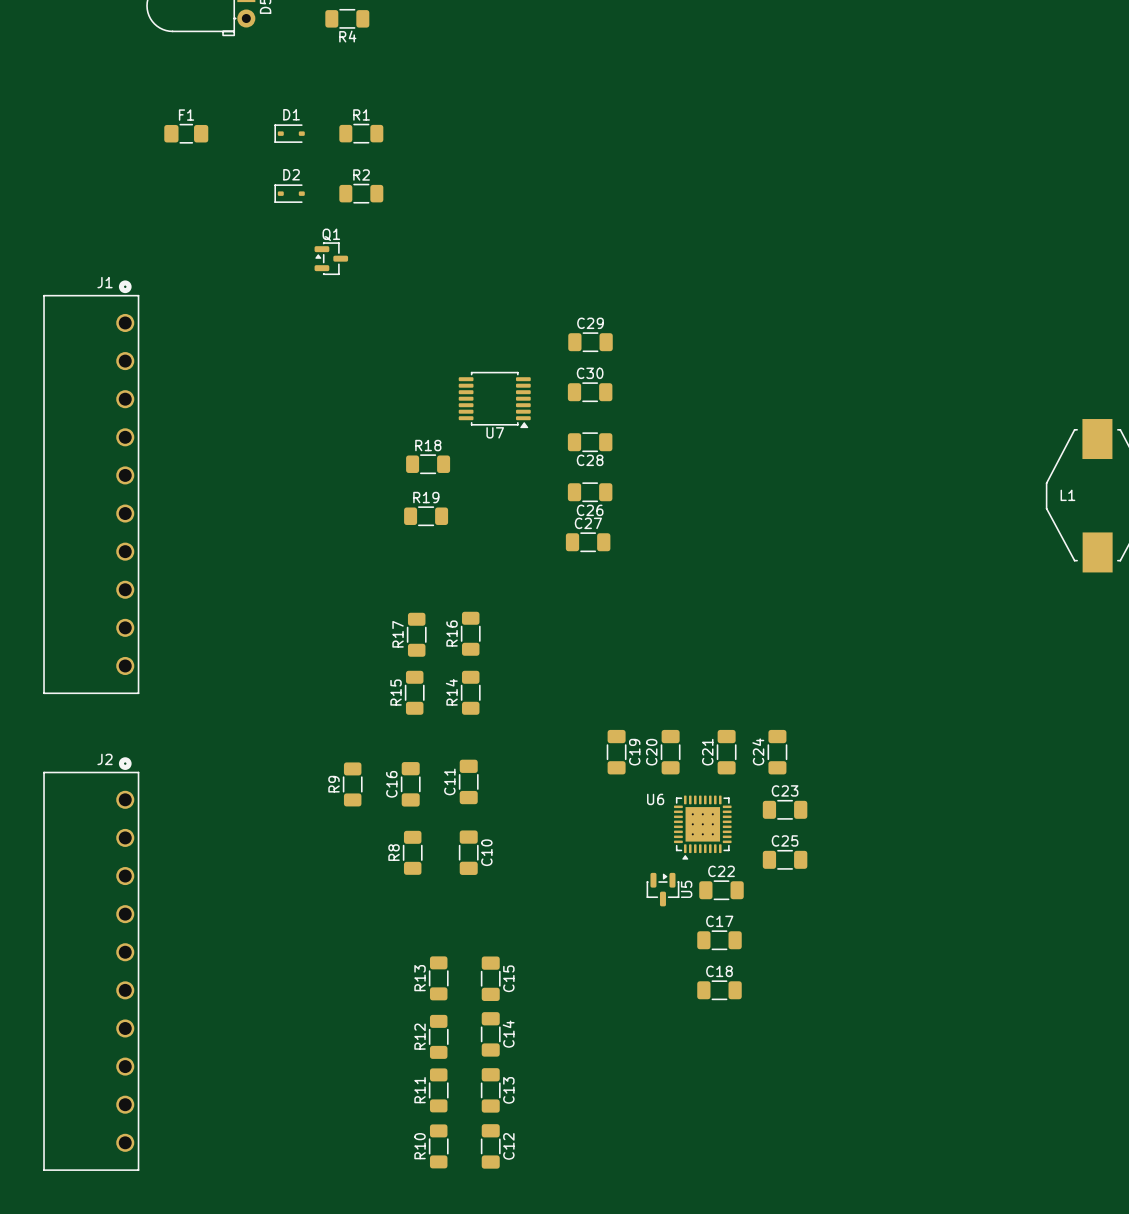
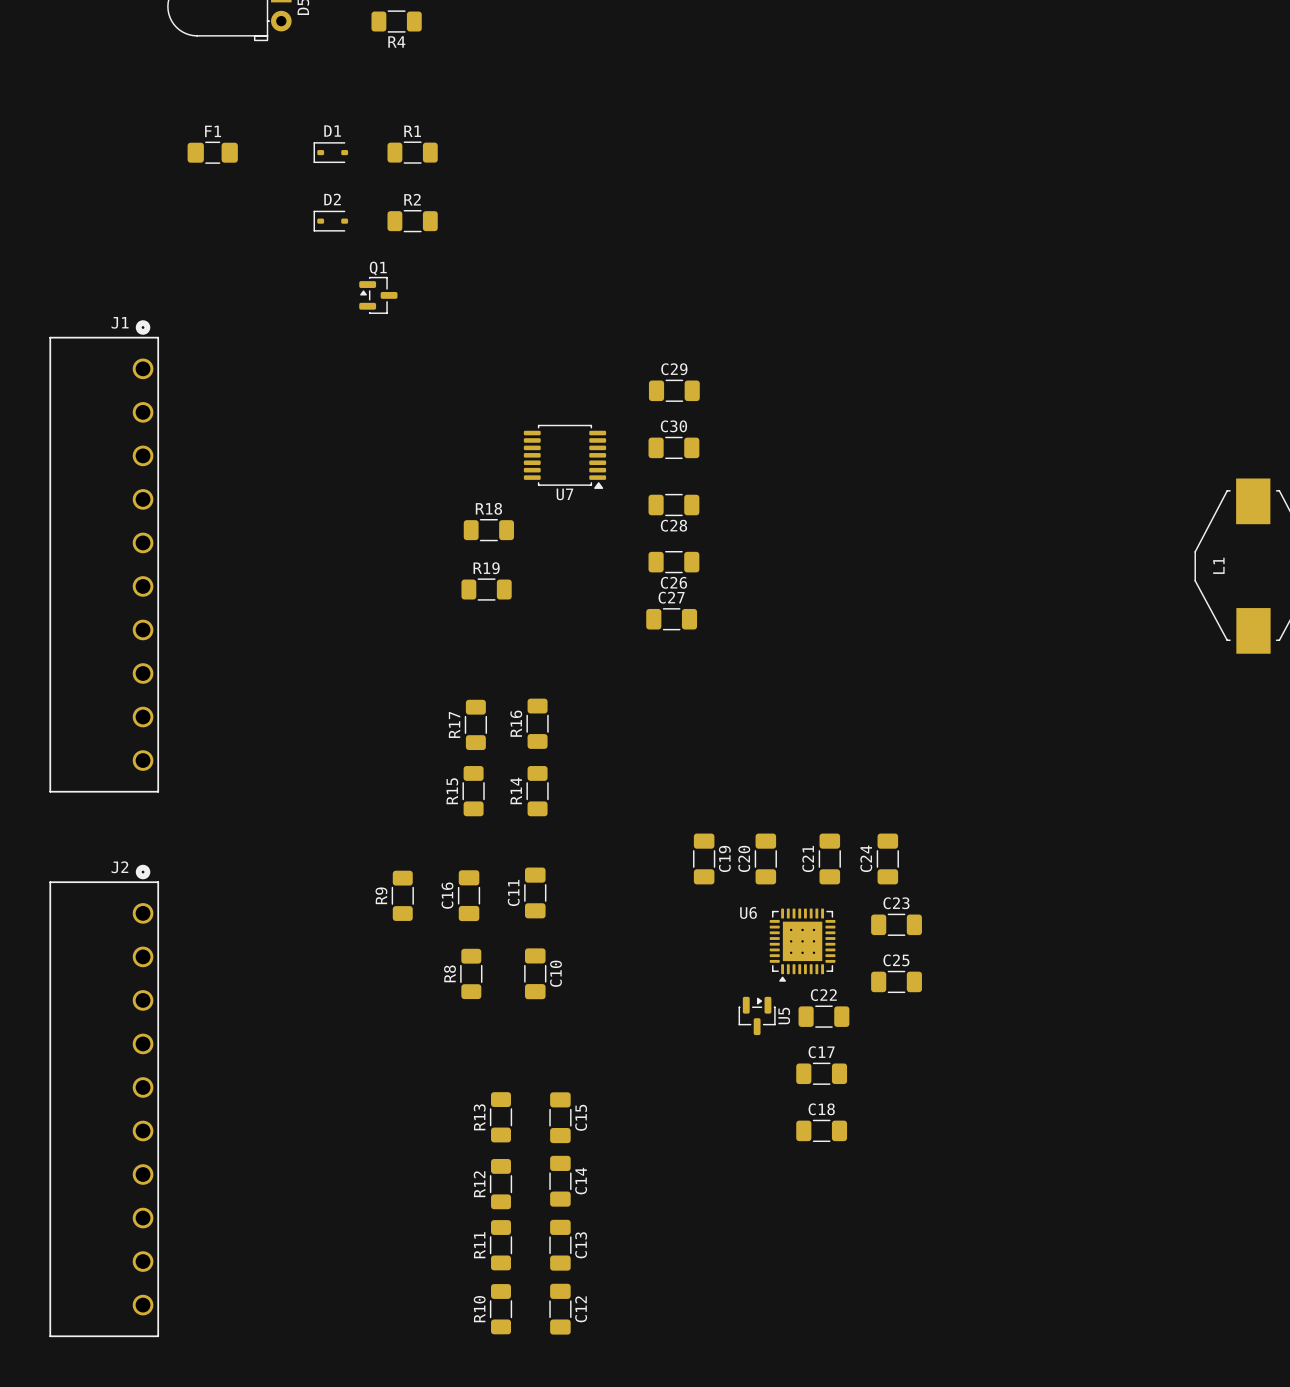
L1 name rotation: 0° (1067, 495) -> 90° counterclockwise (1218, 565)

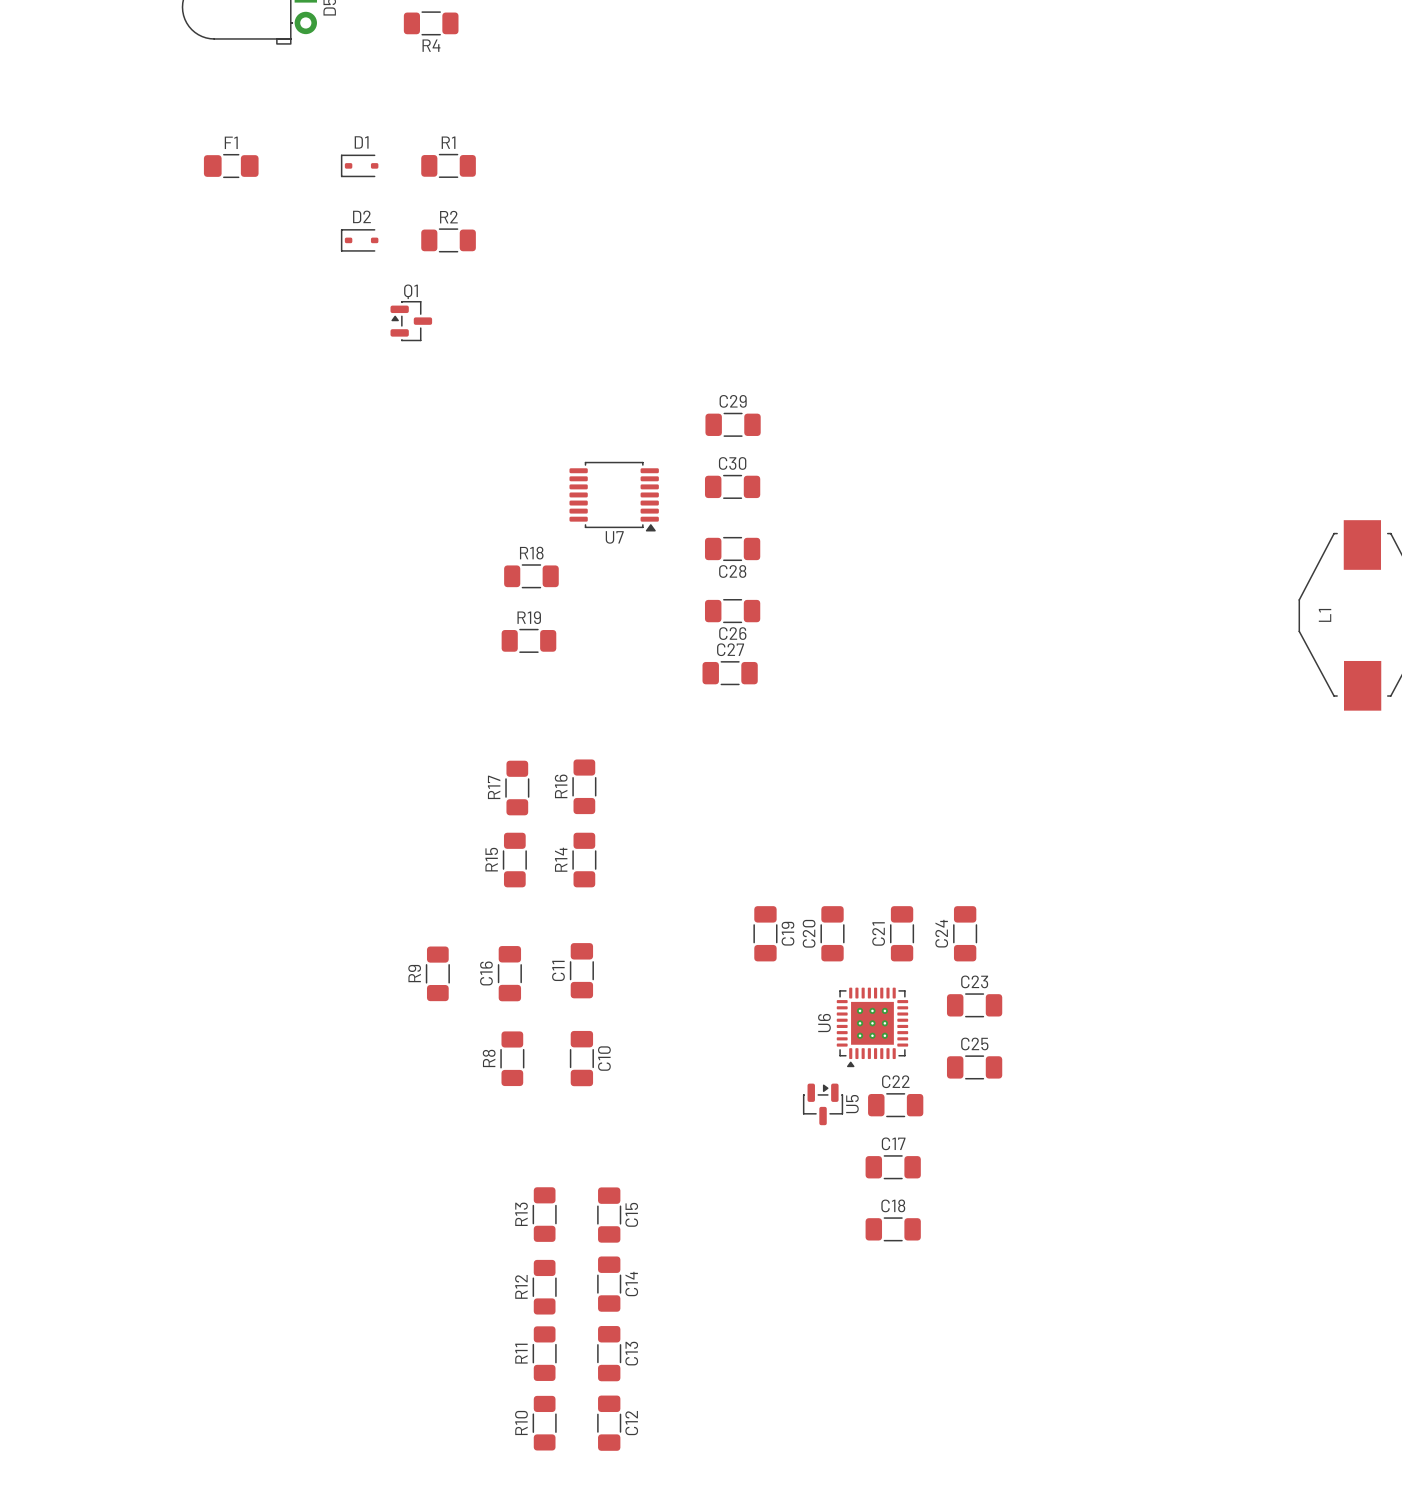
J1: (104, 556) -> none
U6 name rotation: 0° (748, 912) -> 90° counterclockwise (824, 1023)
U6 name position: U6 (748, 912) -> U6 (824, 1023)
J2: (104, 1100) -> none

